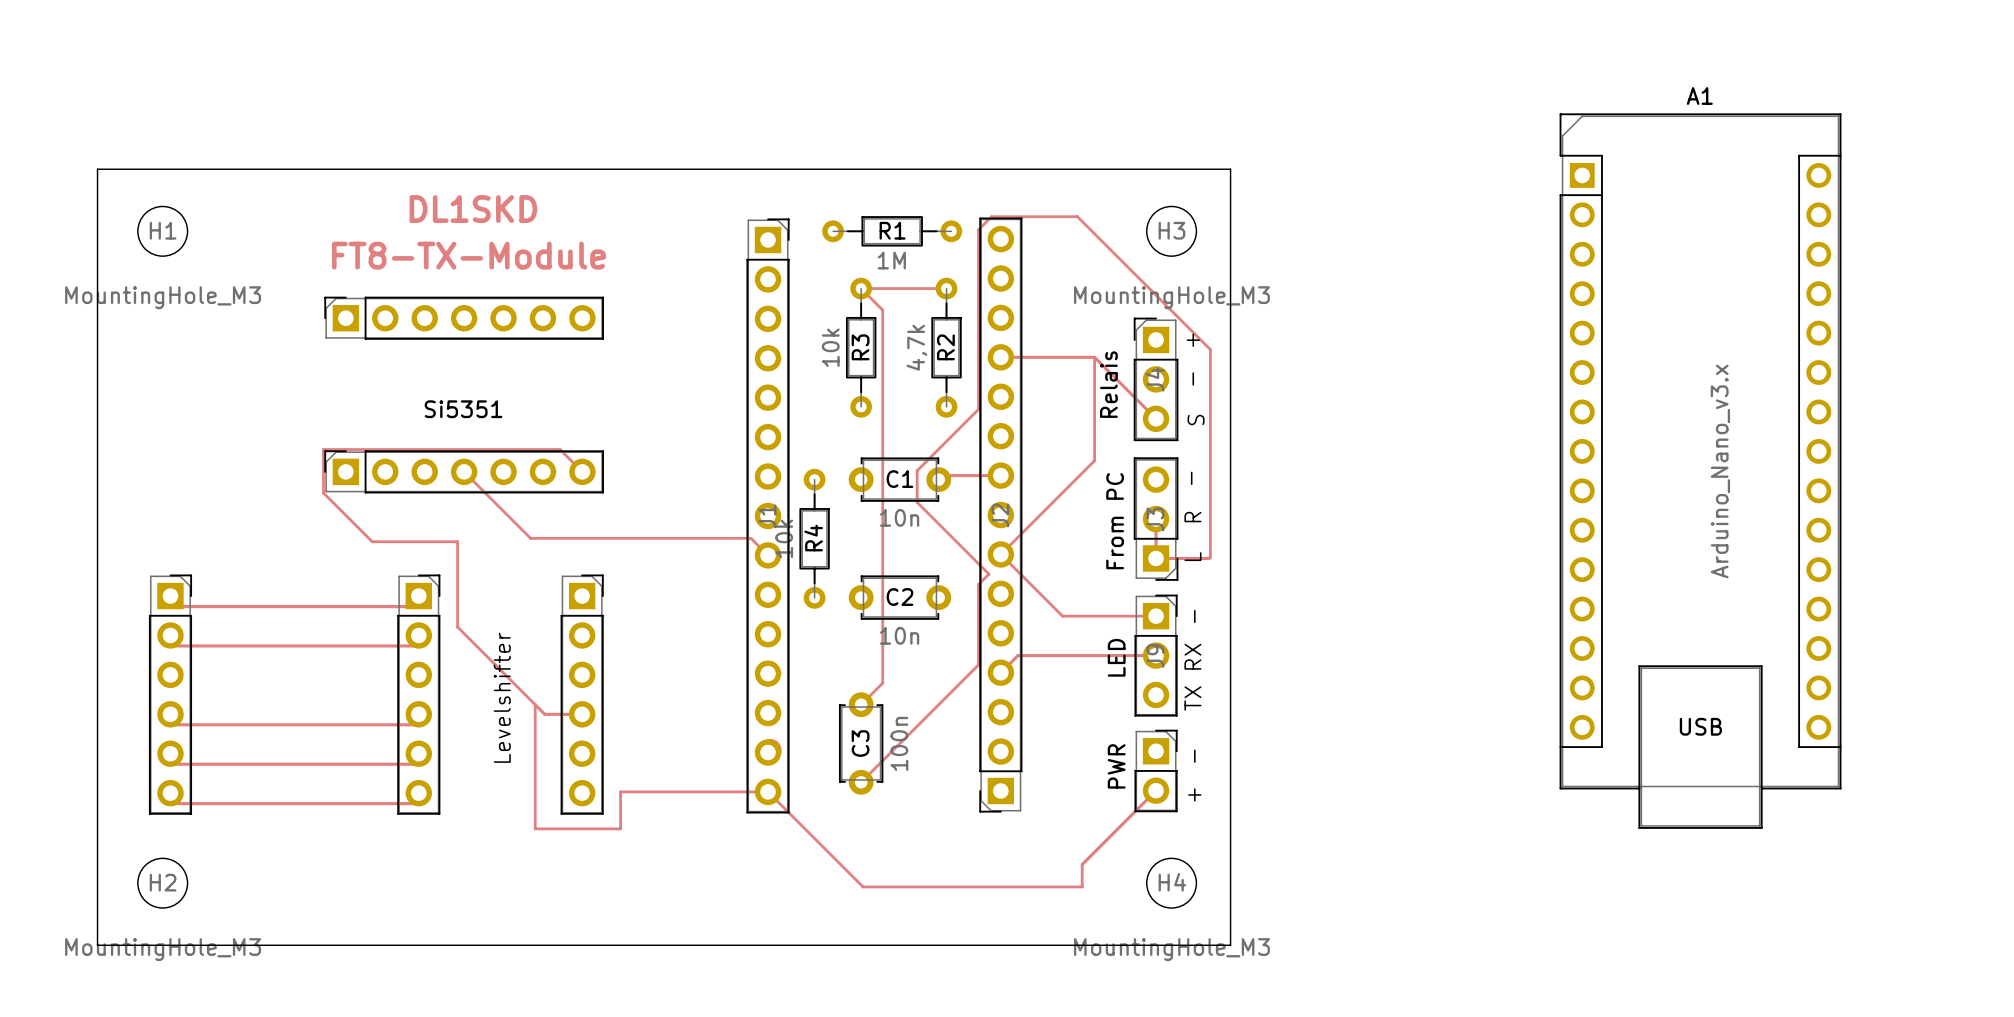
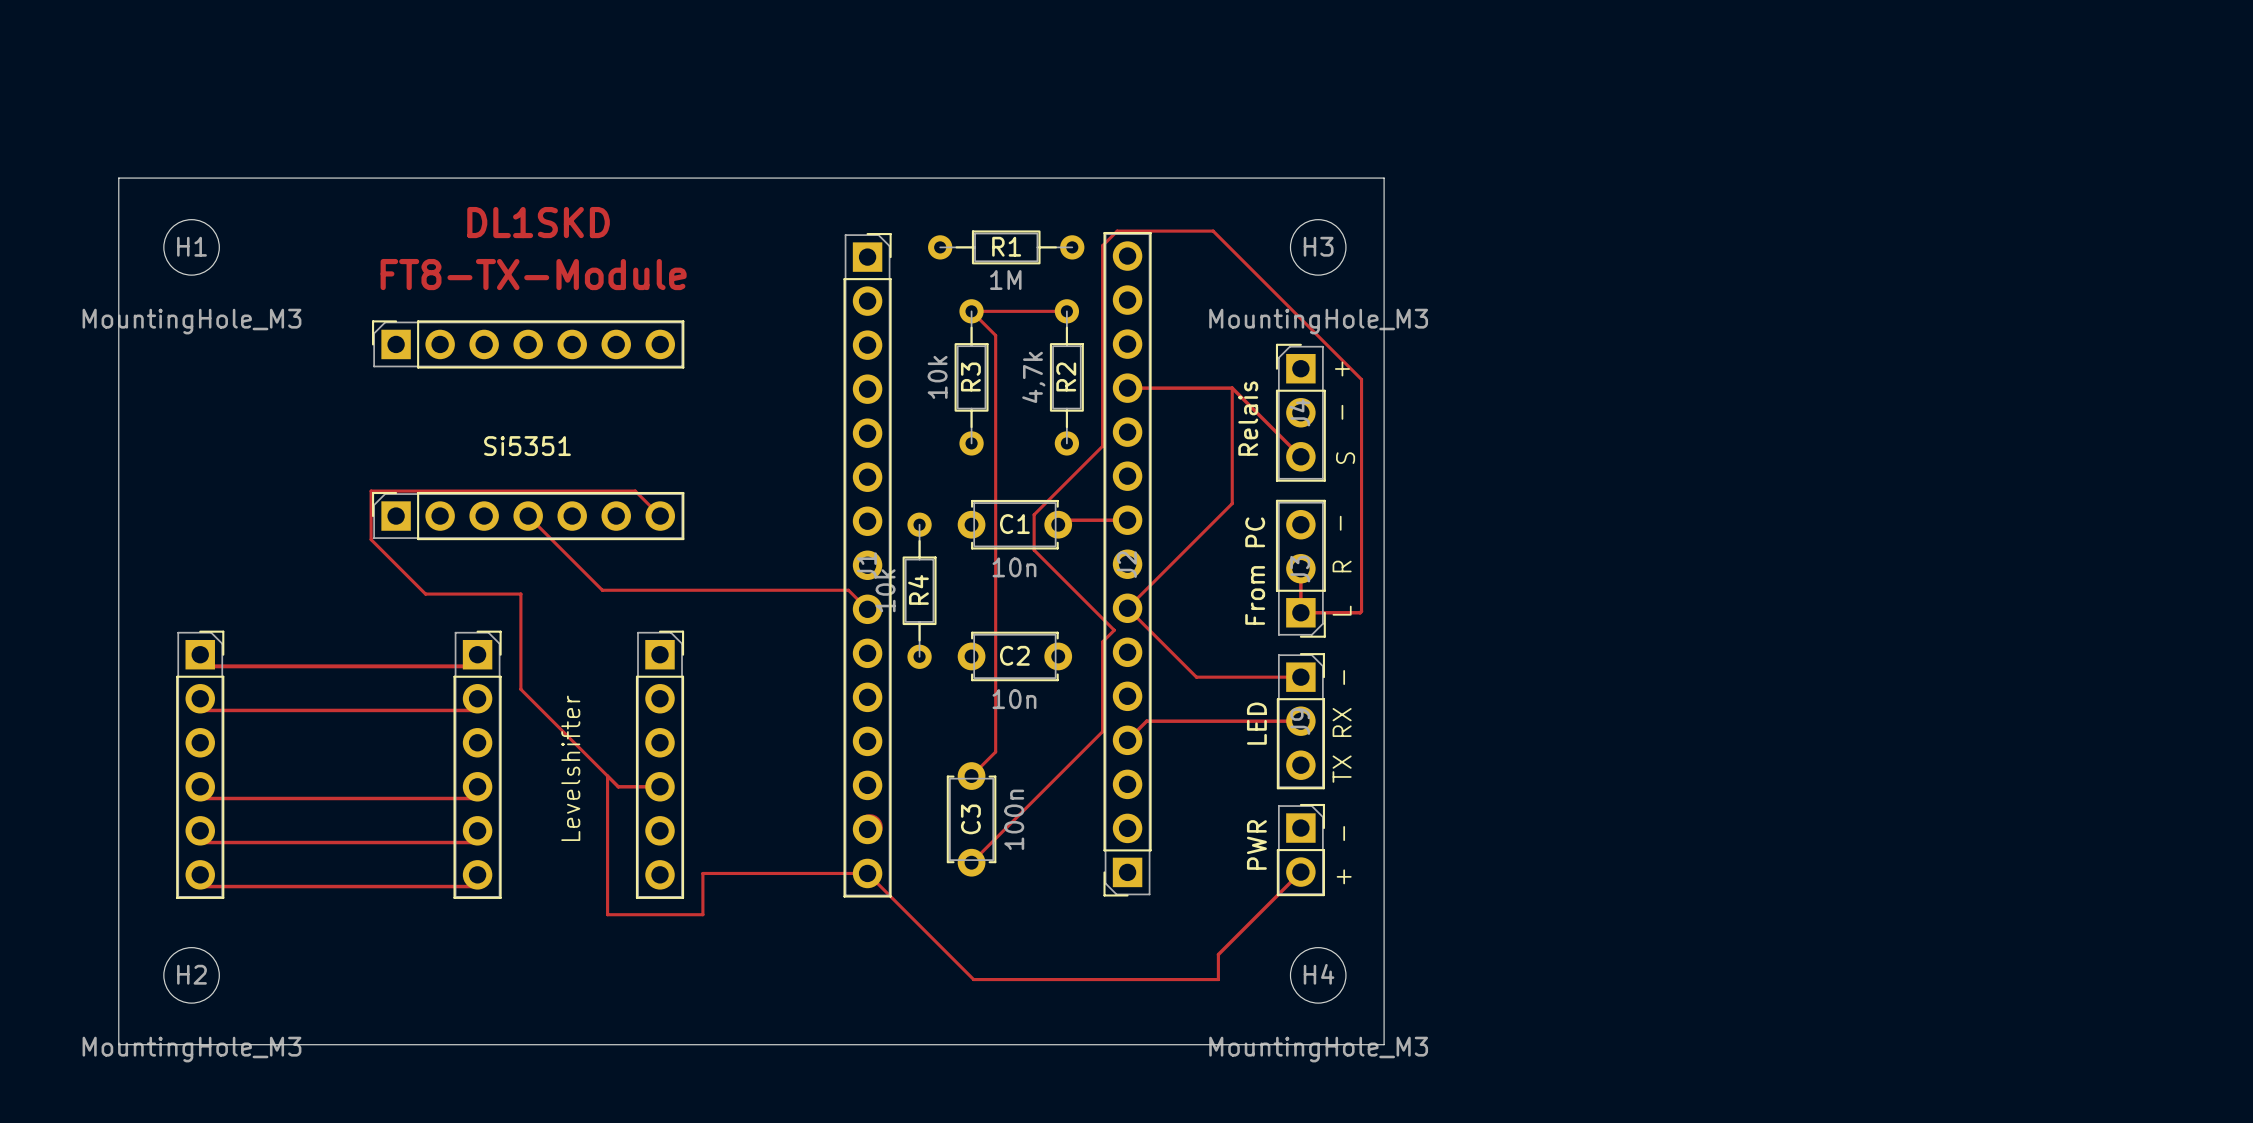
A1: Arduino_Nano_v3.x (1700, 471) -> none

